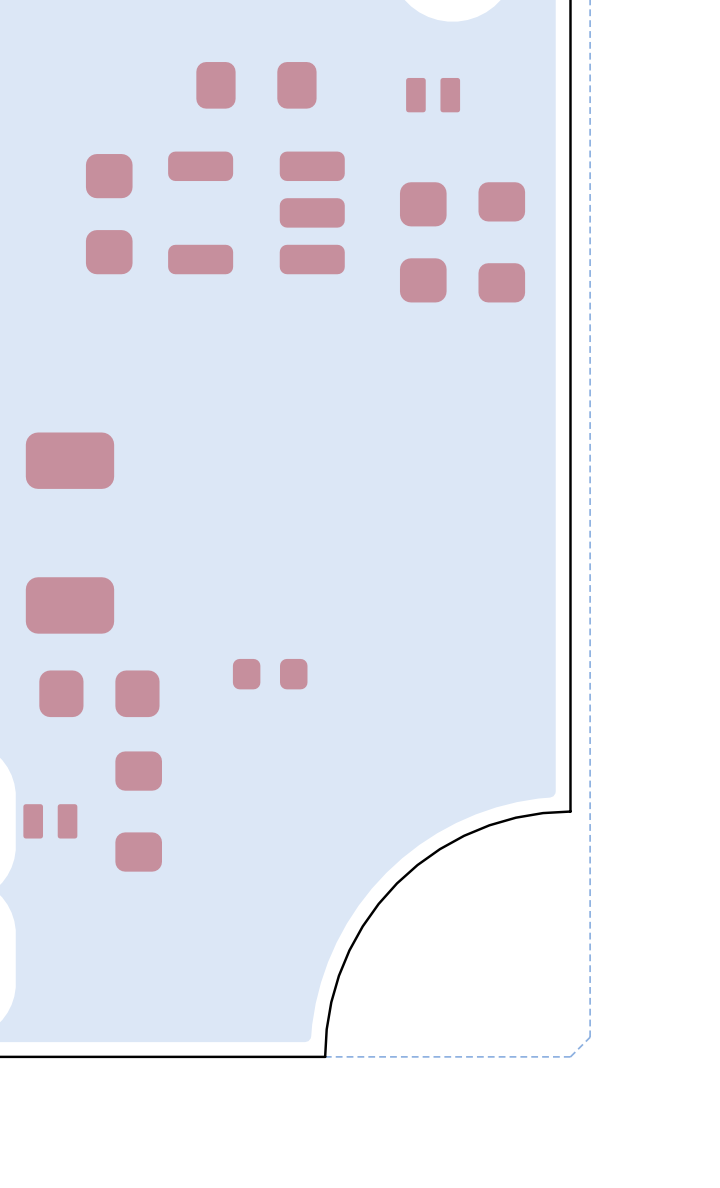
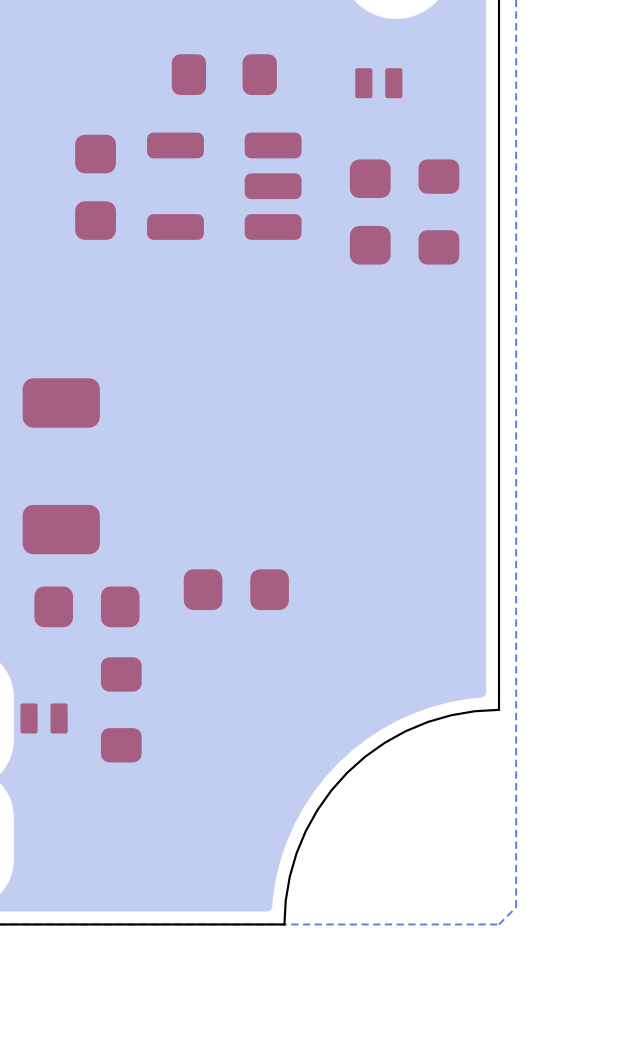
part footprint: [232, 658, 308, 690] -> [183, 569, 289, 611]

